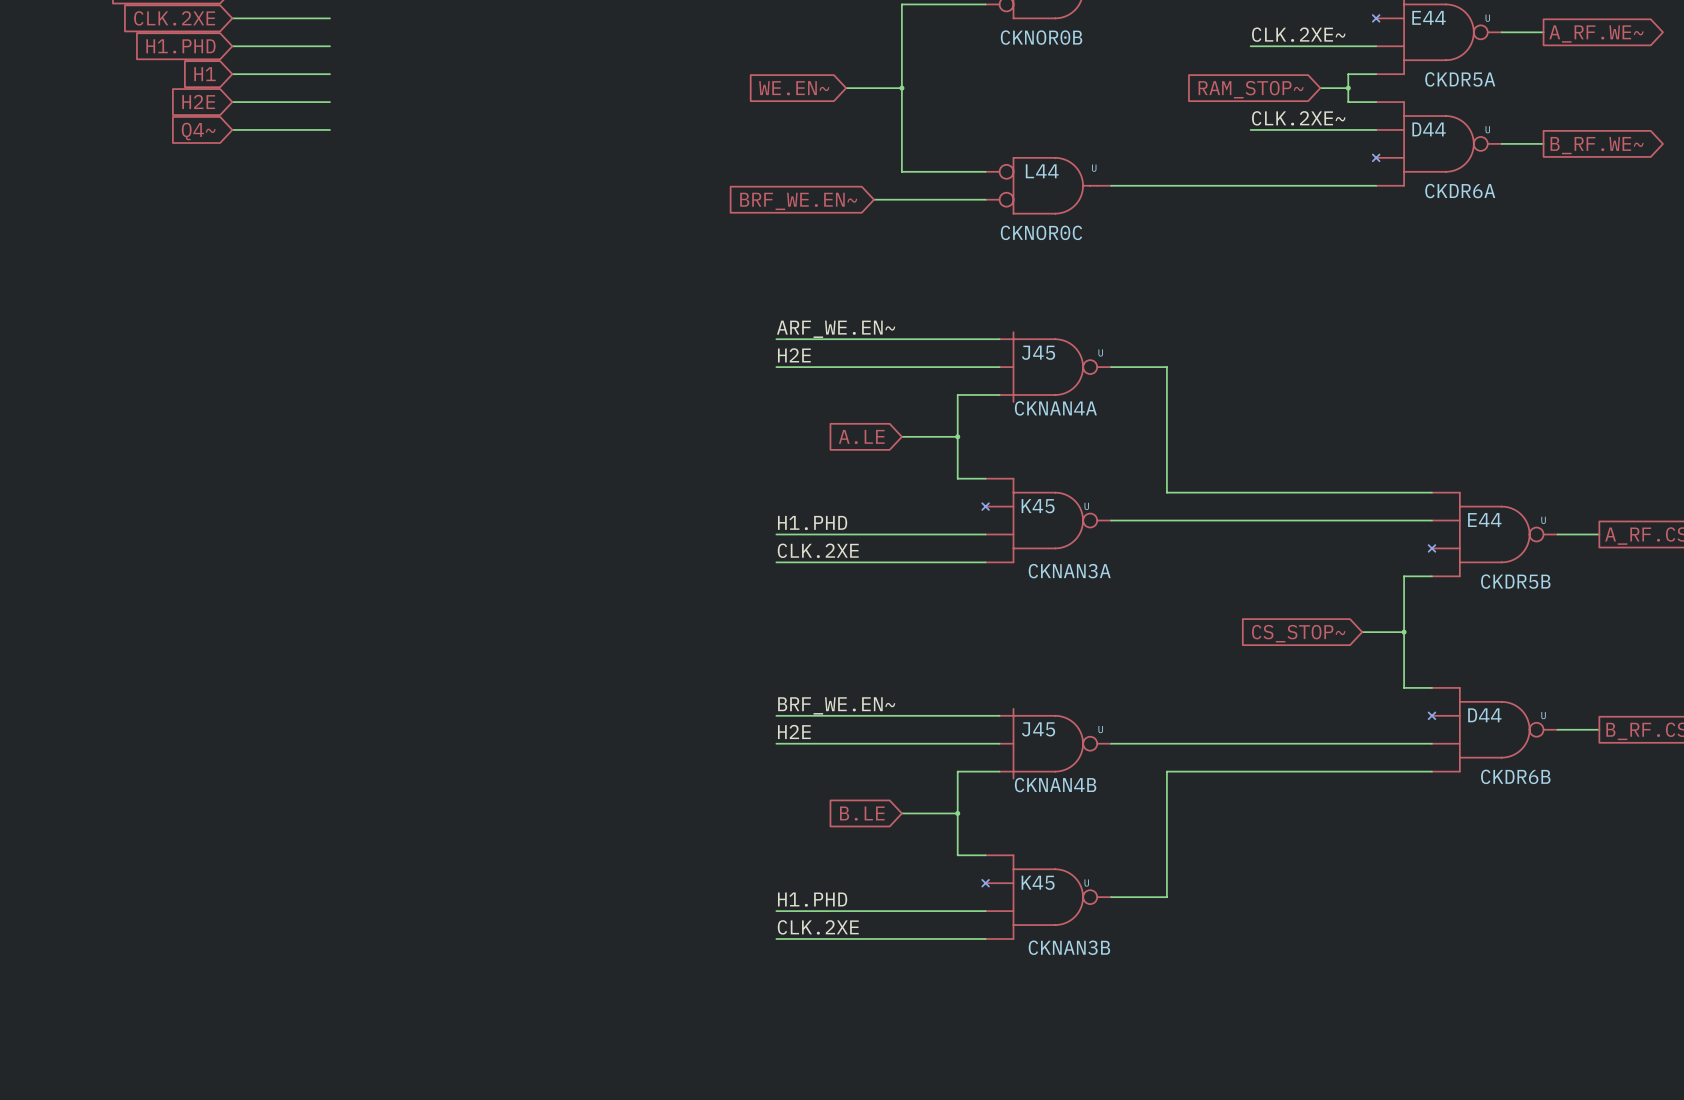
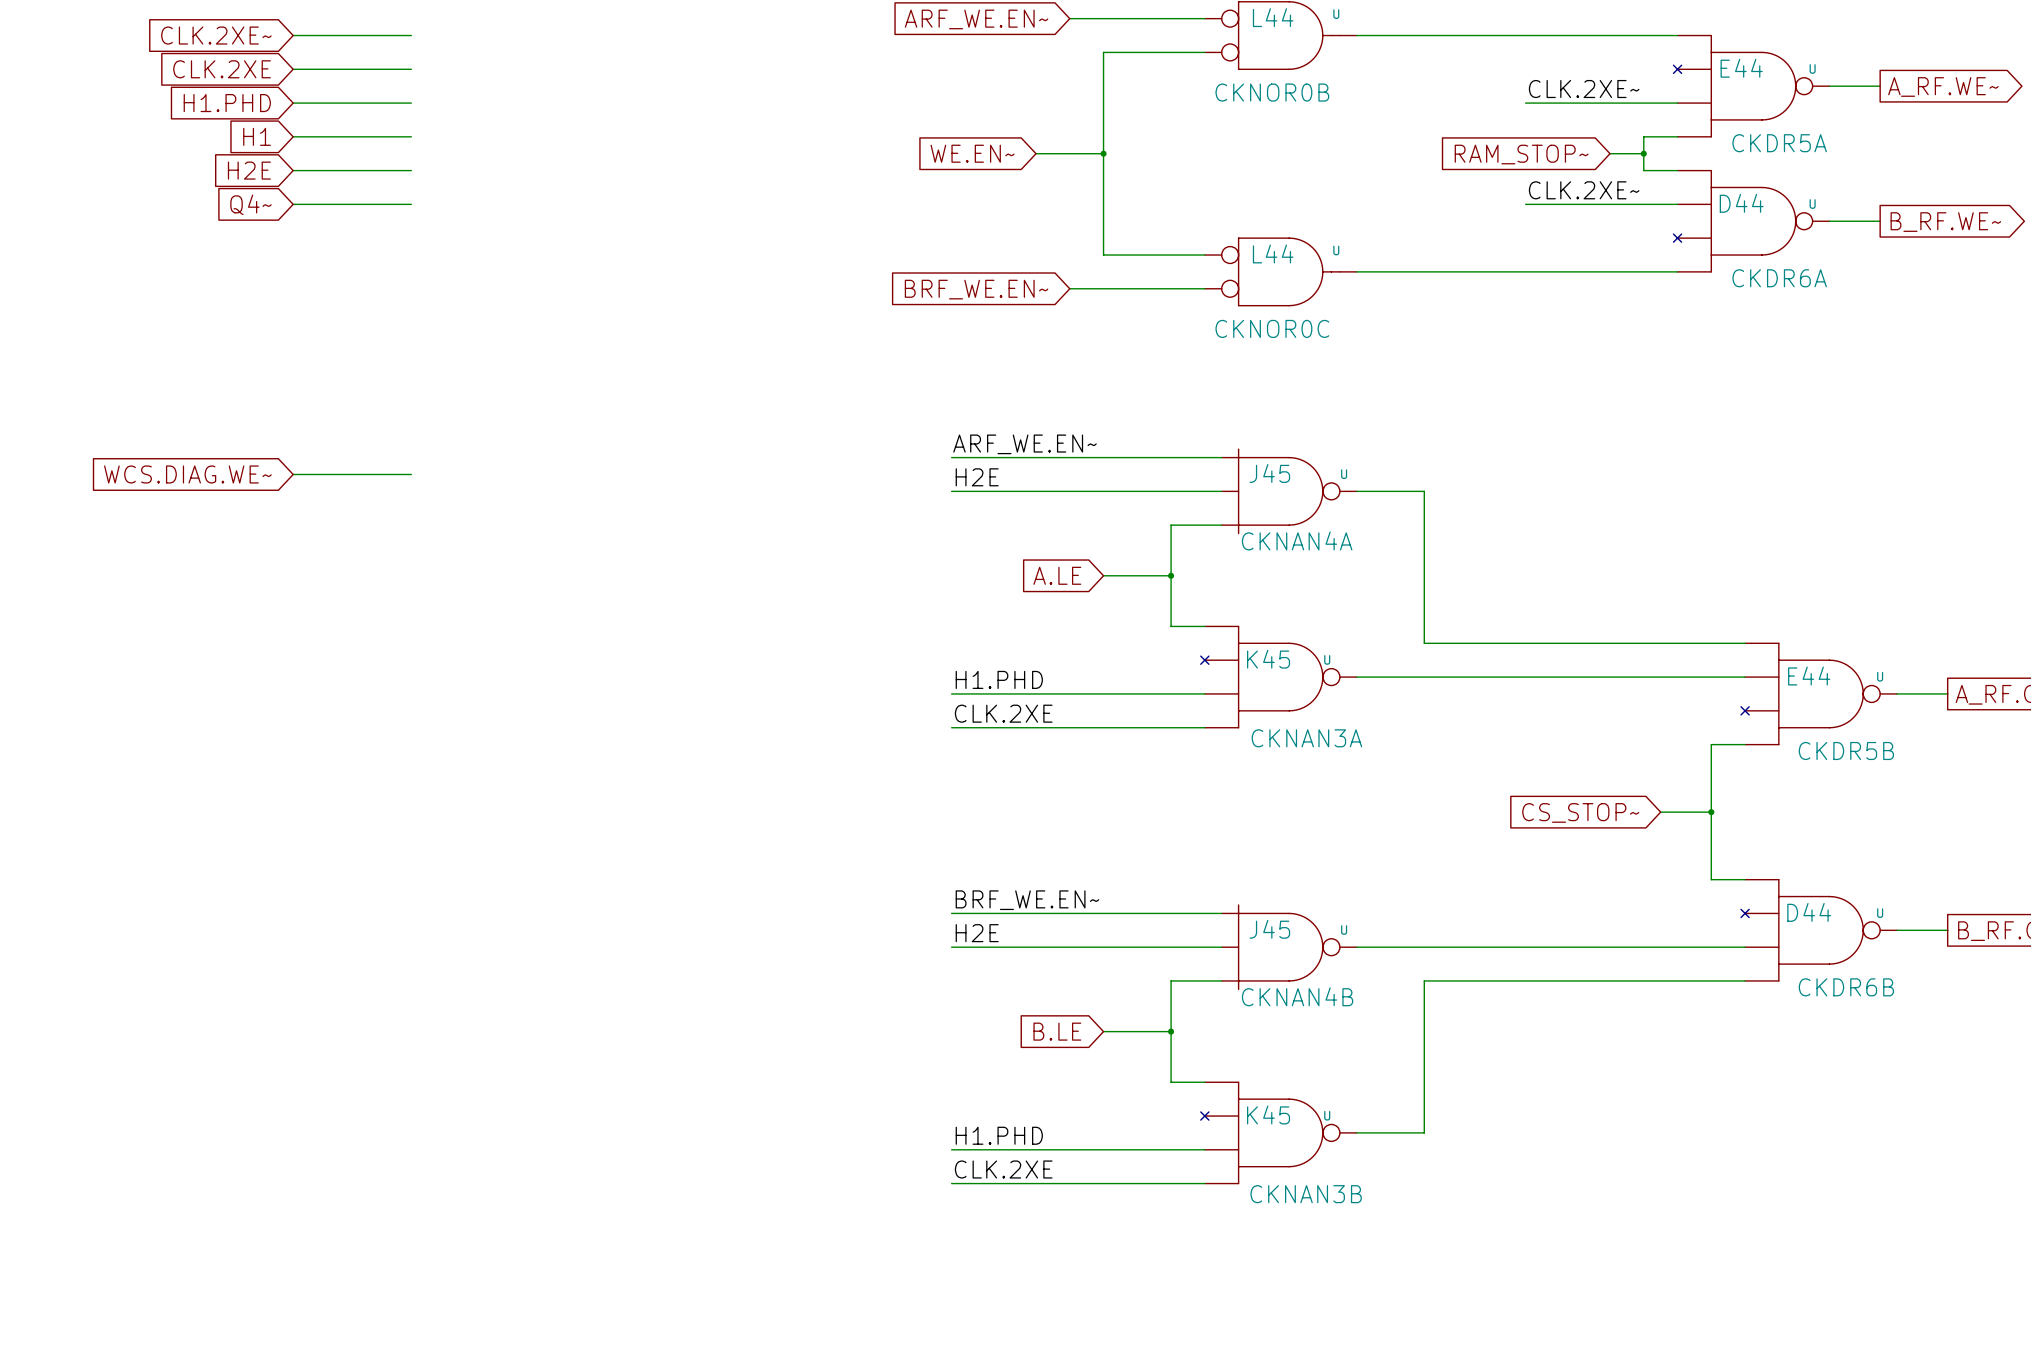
global label: none -> WCS.DIAG.WE~ (187, 474)
wire: none -> (293, 474) (411, 474)

